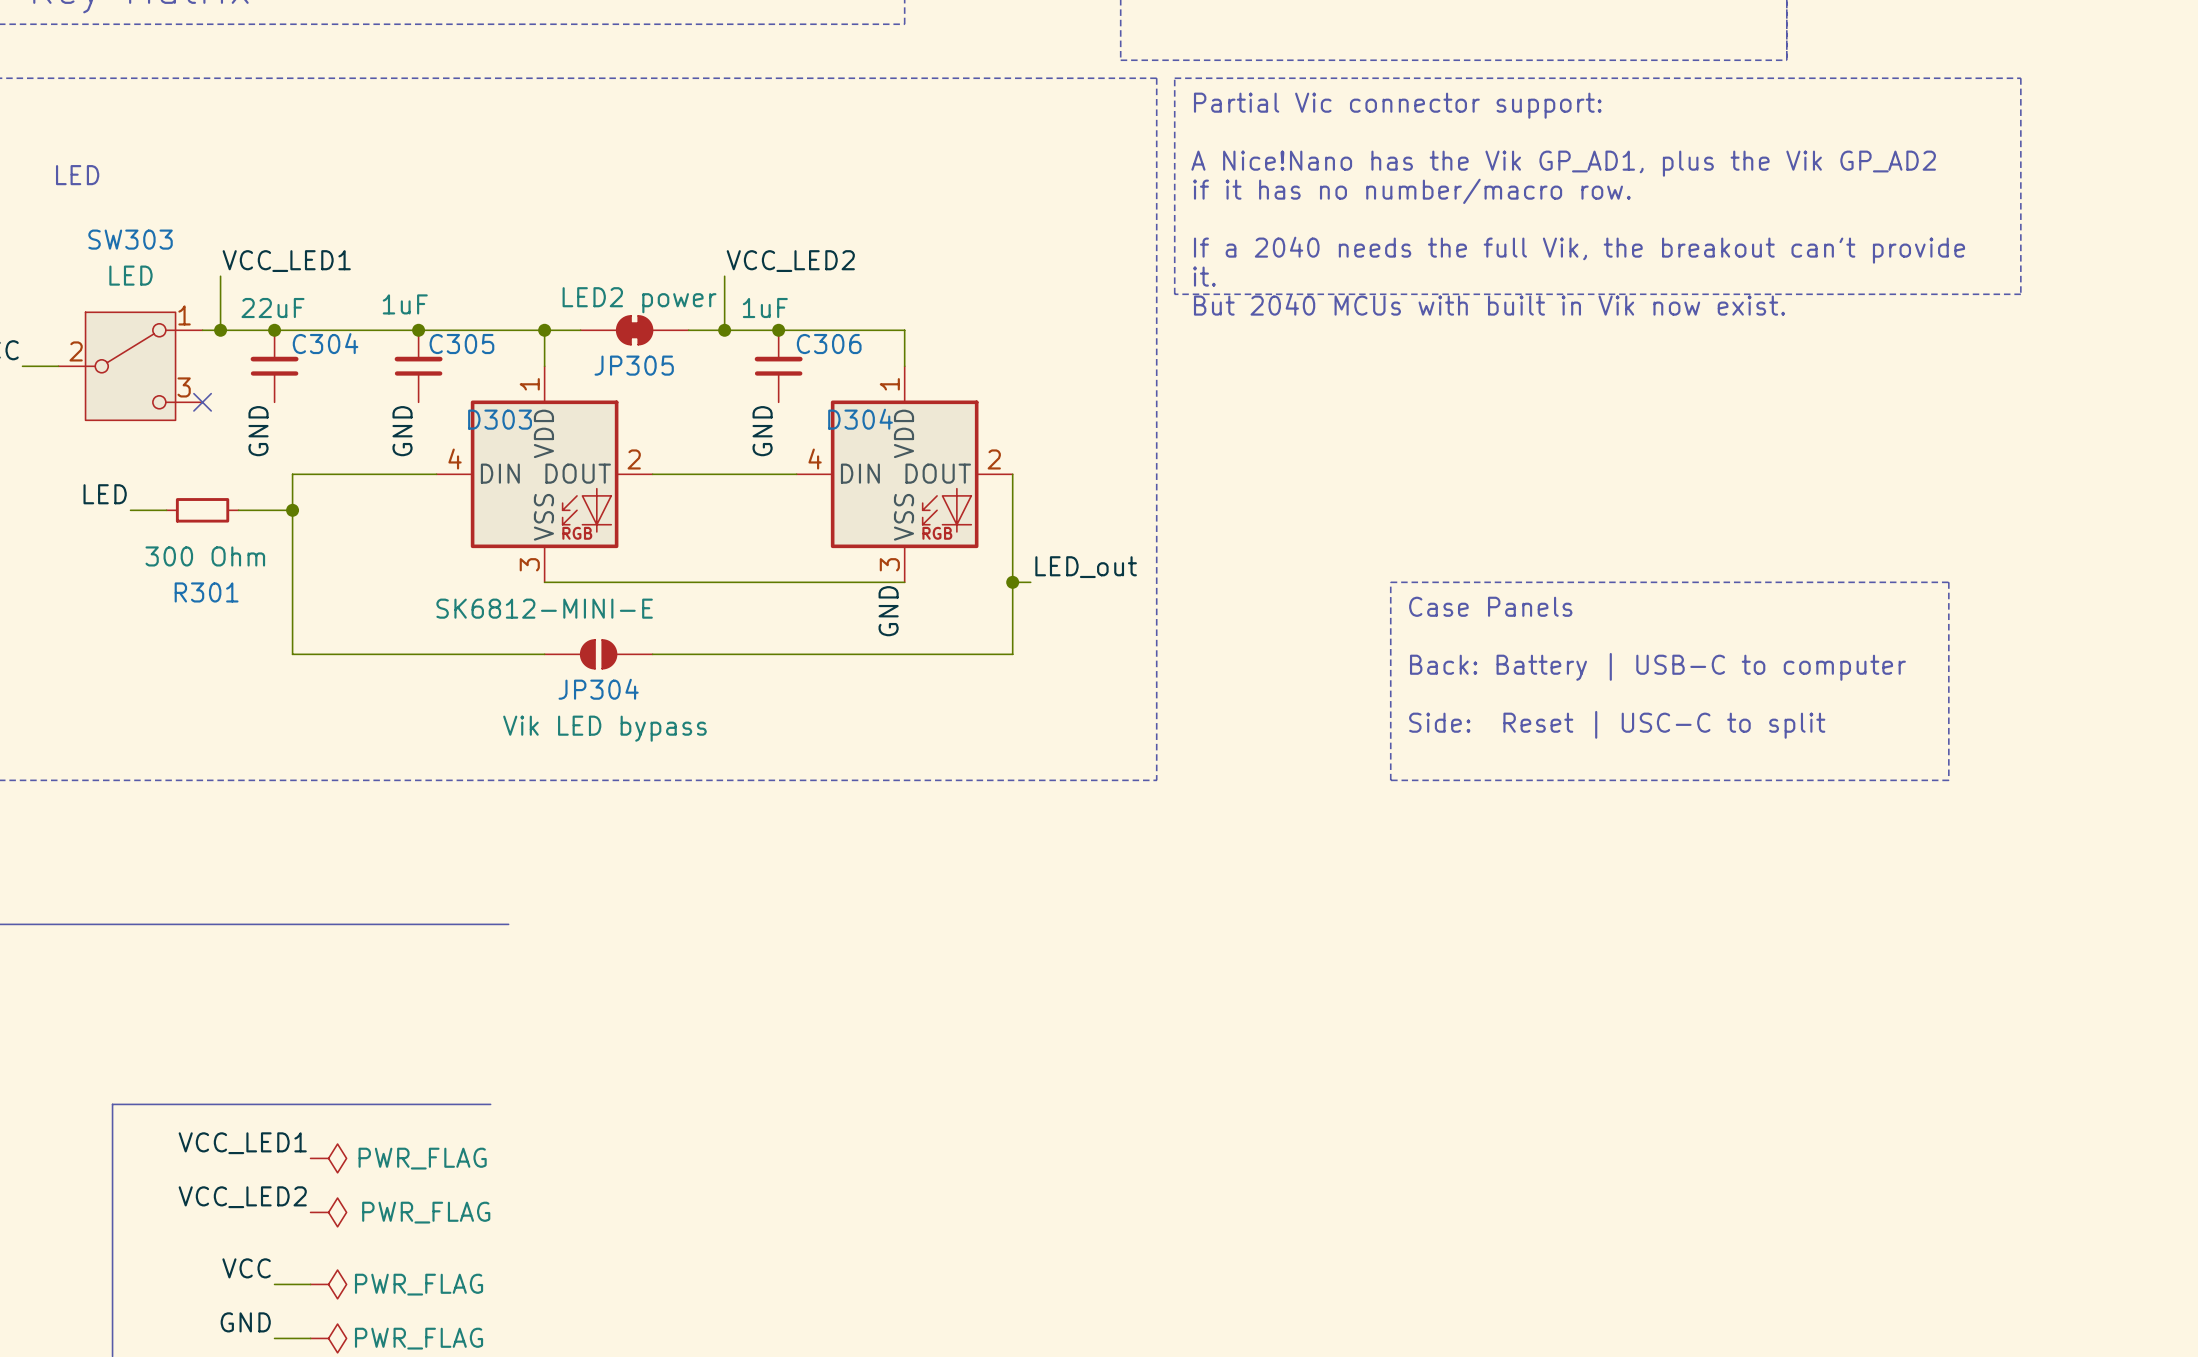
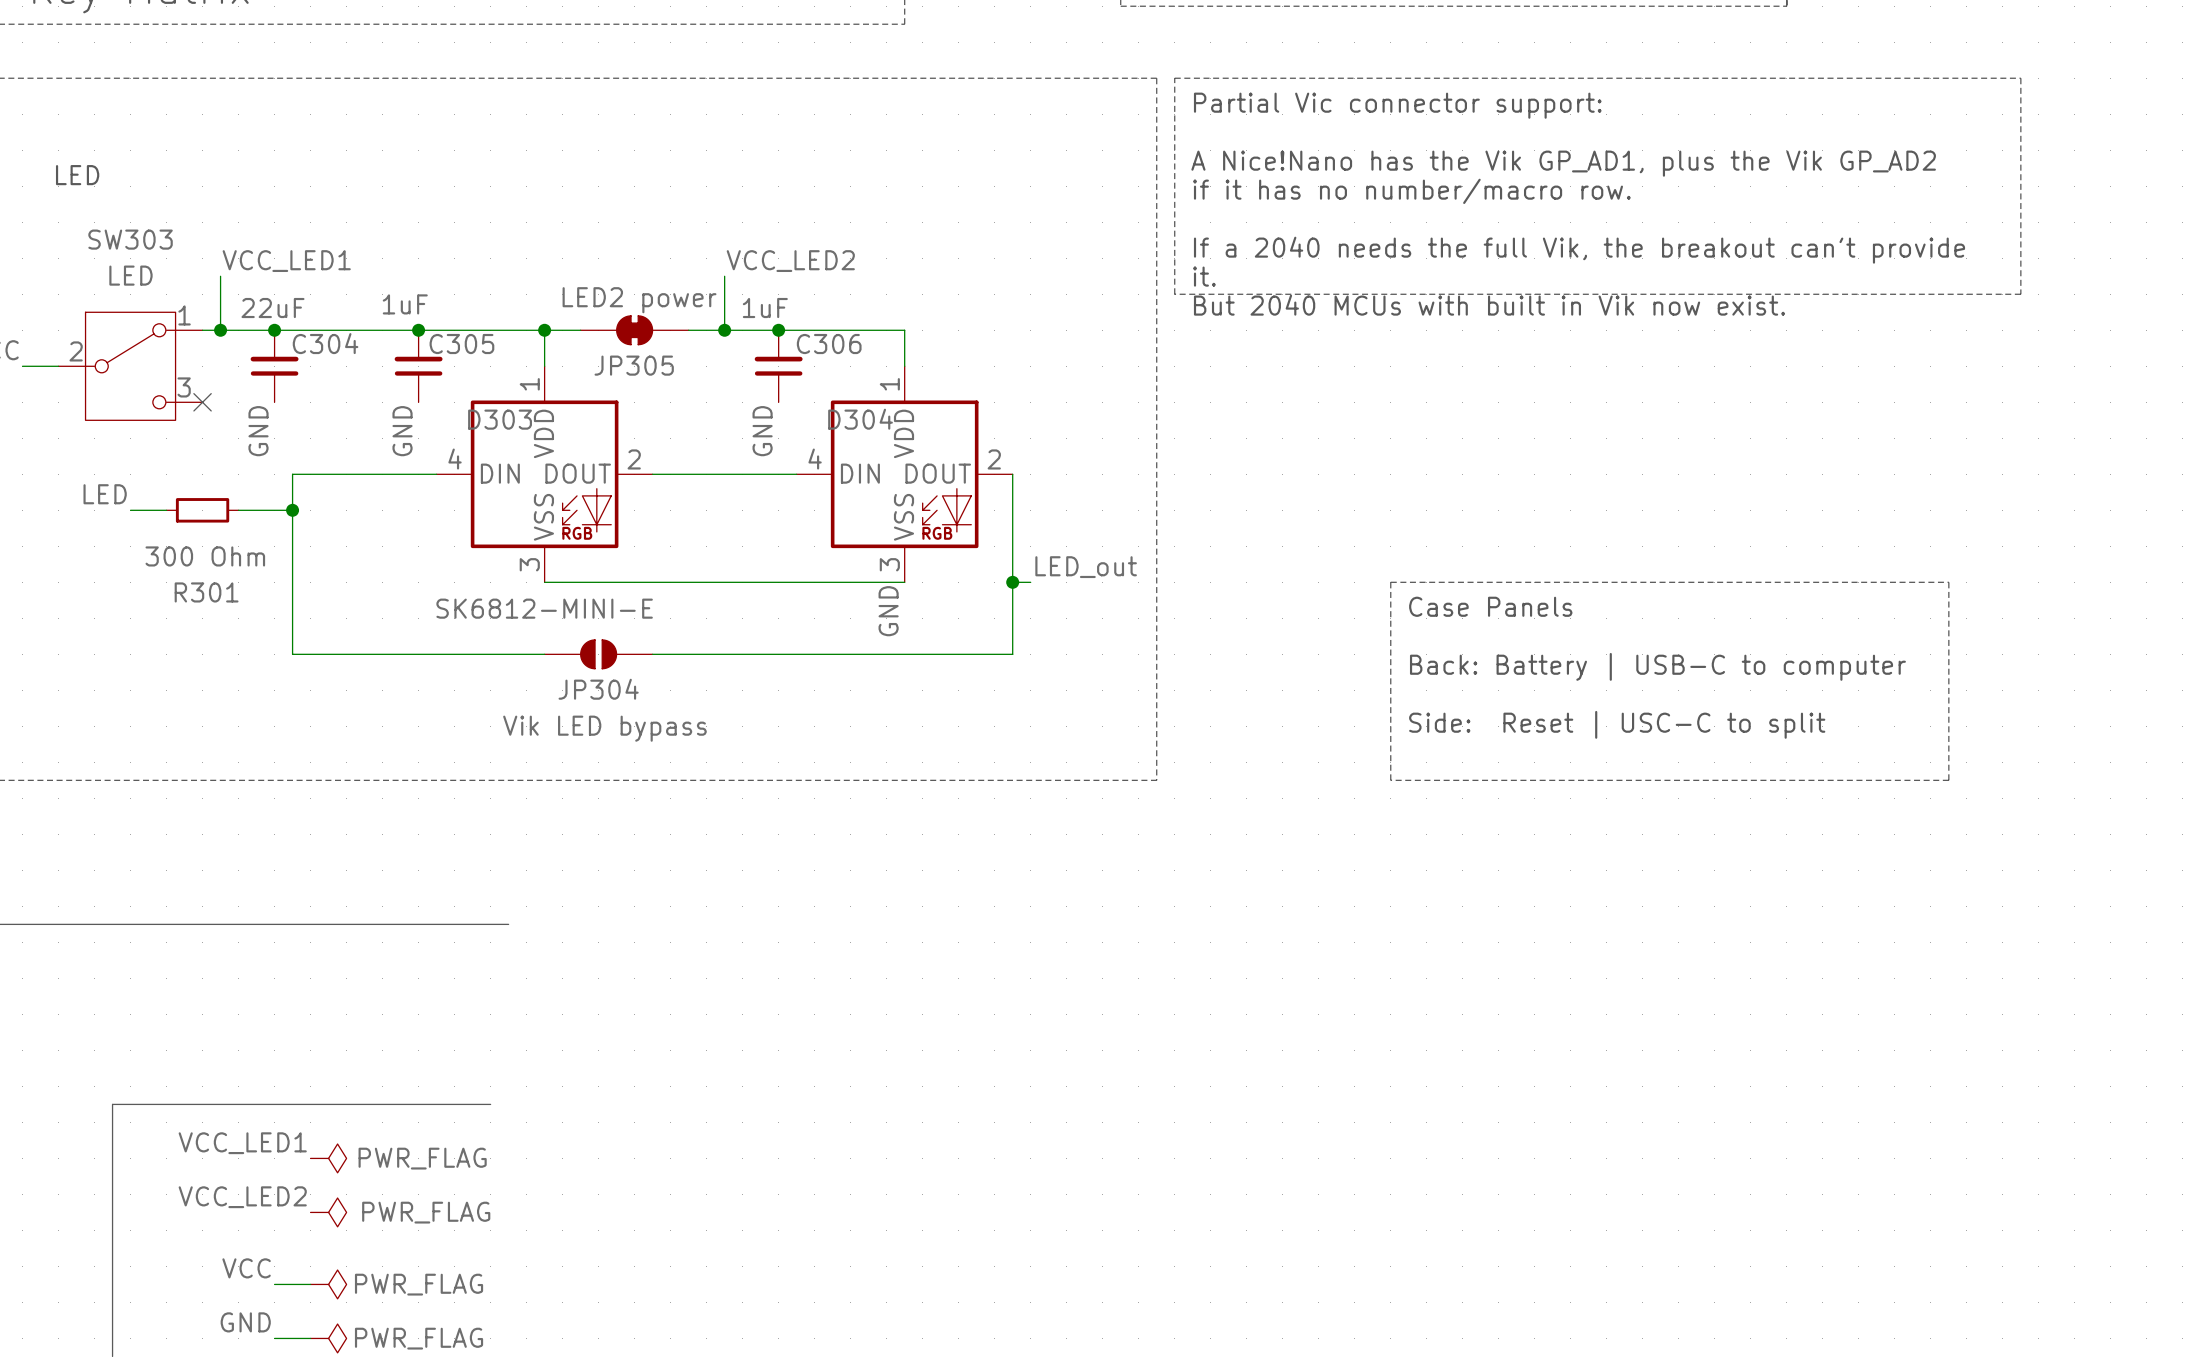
line: (1120, 6) (1120, 60) (1786, 60) (1786, 6) -> (1120, 6) (1786, 6)

